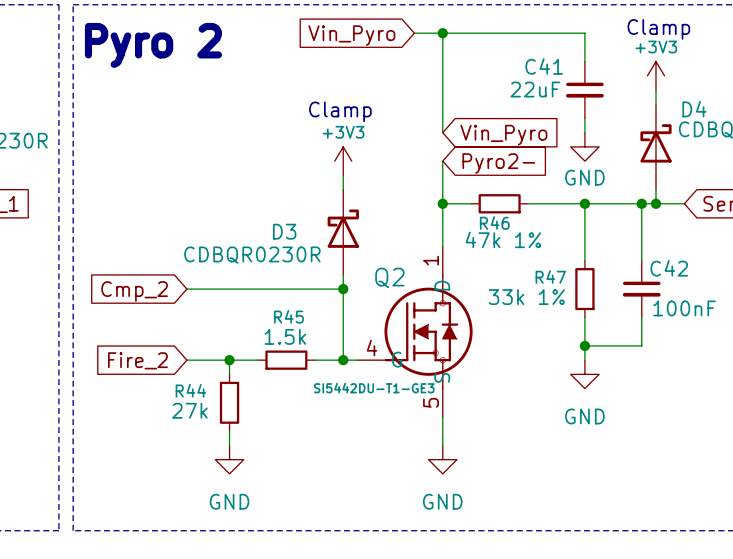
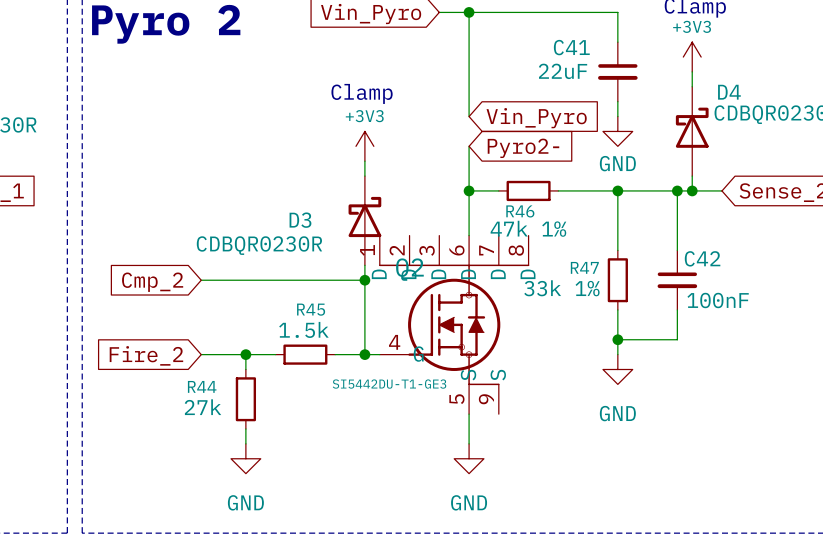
Q2 symbol: [357, 246, 473, 418] -> [379, 235, 530, 415]

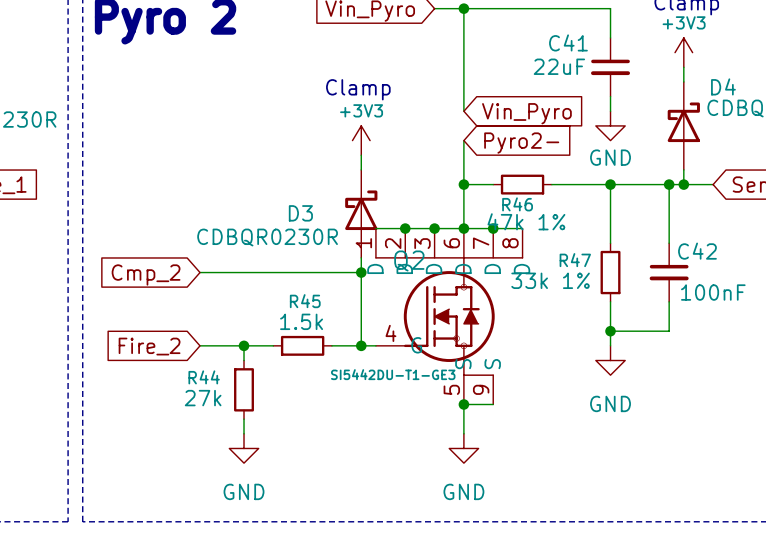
wire: none -> (375, 228) (522, 228)
junction: none -> (405, 228)
junction: none -> (434, 228)
junction: none -> (463, 228)
junction: none -> (493, 228)
wire: none -> (463, 404) (493, 404)
junction: none -> (463, 404)

